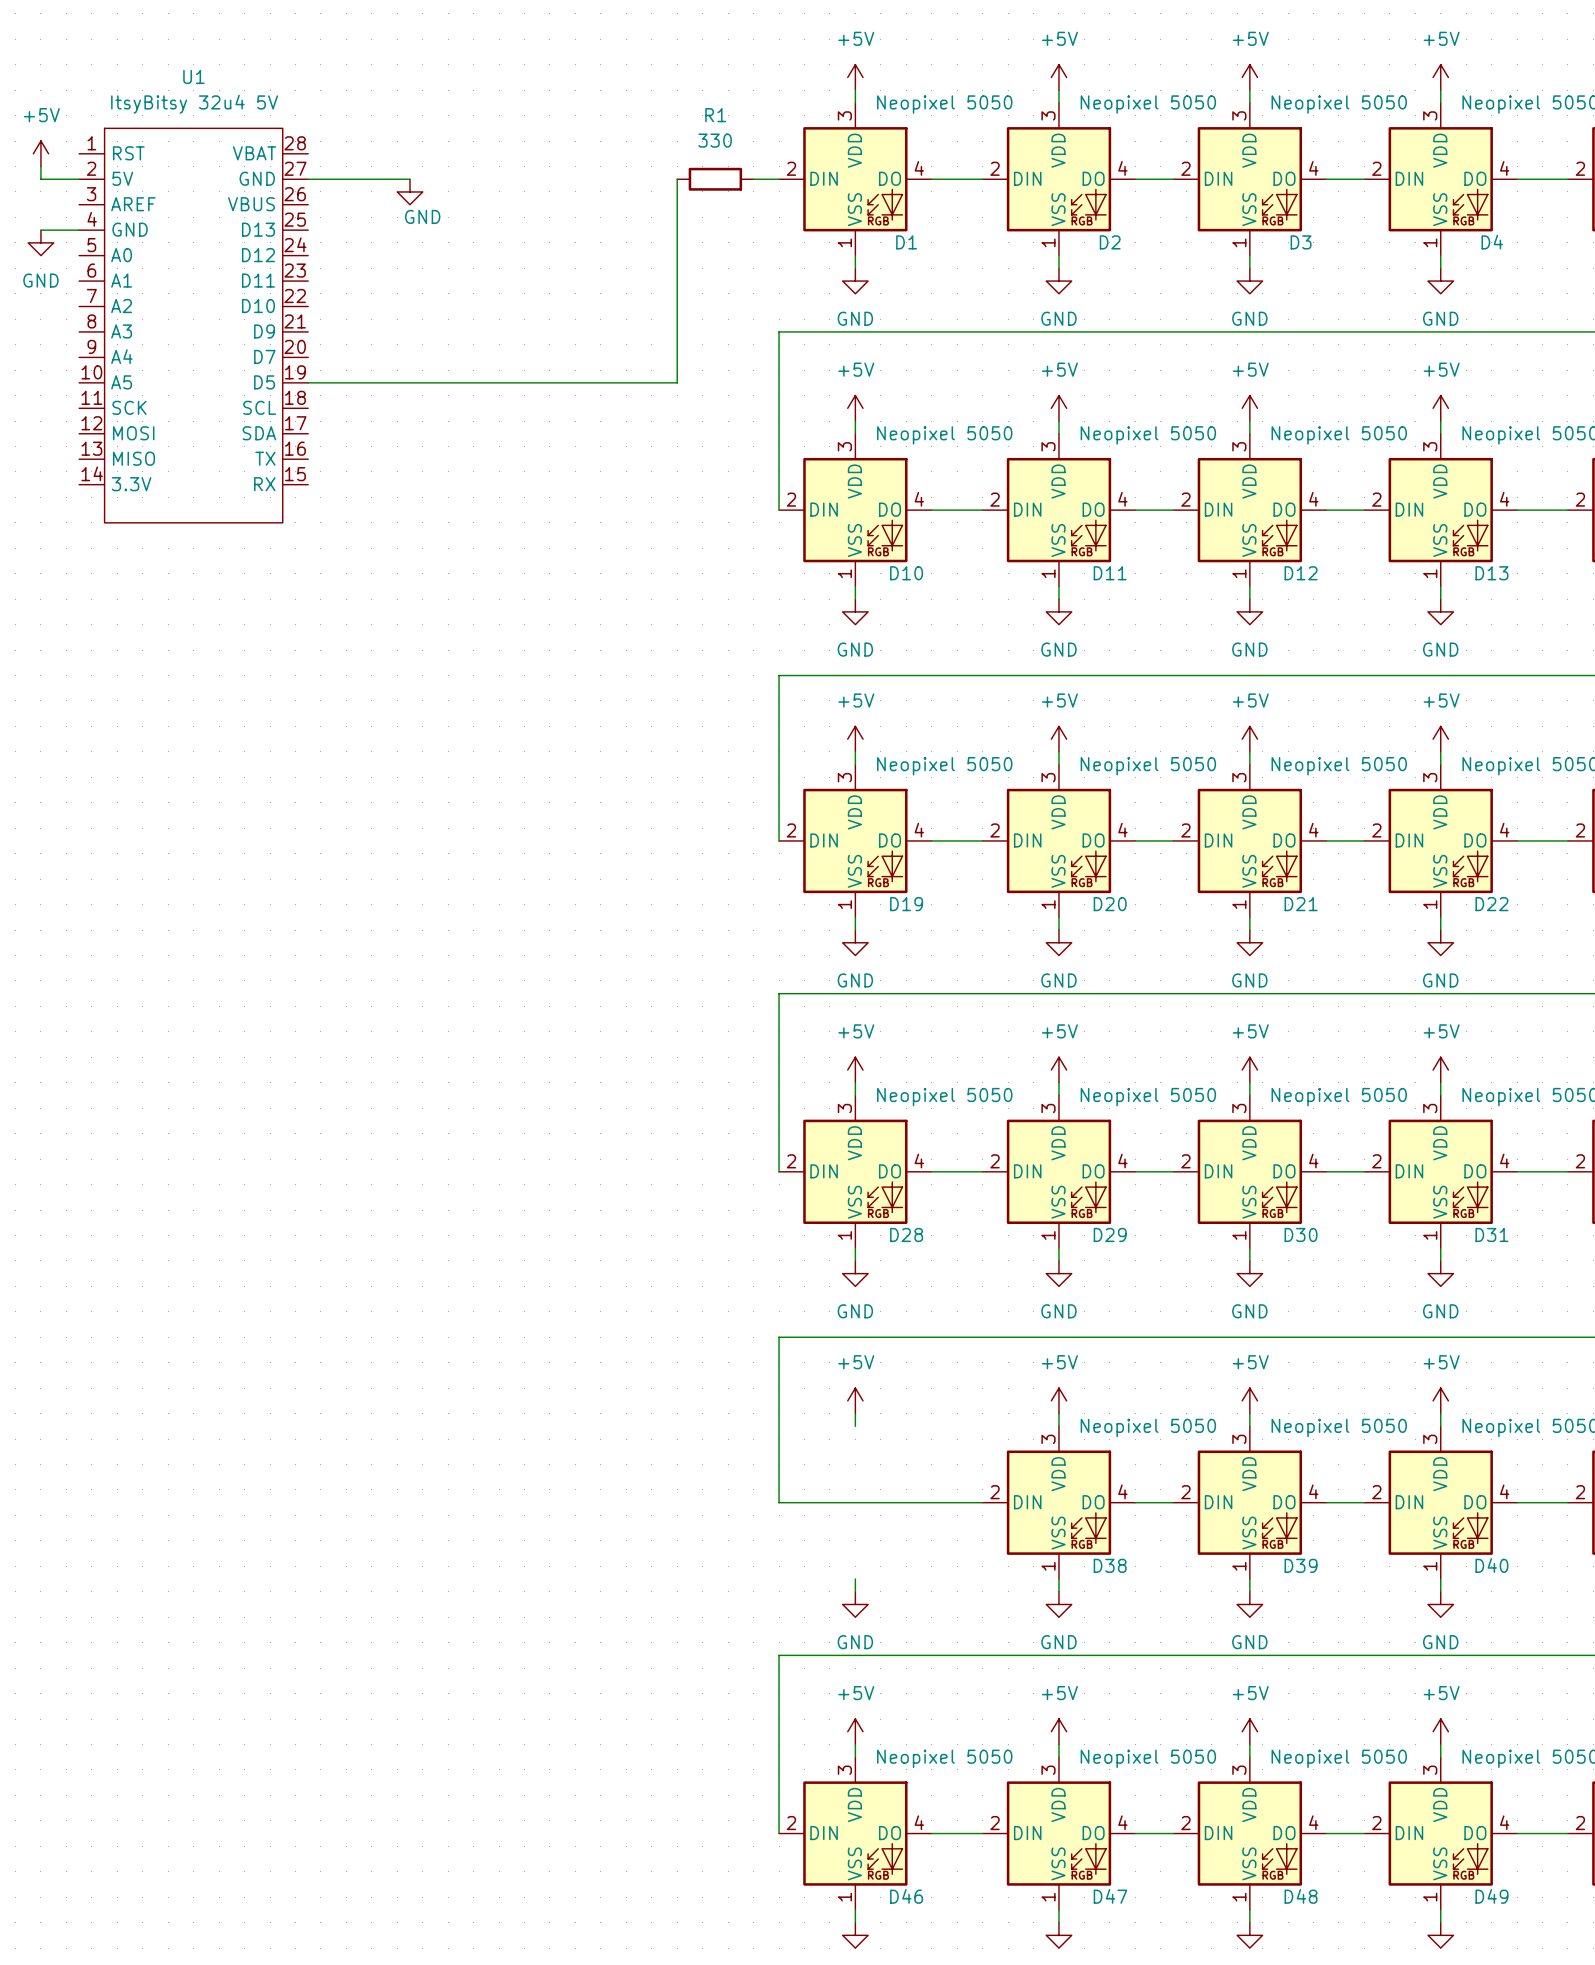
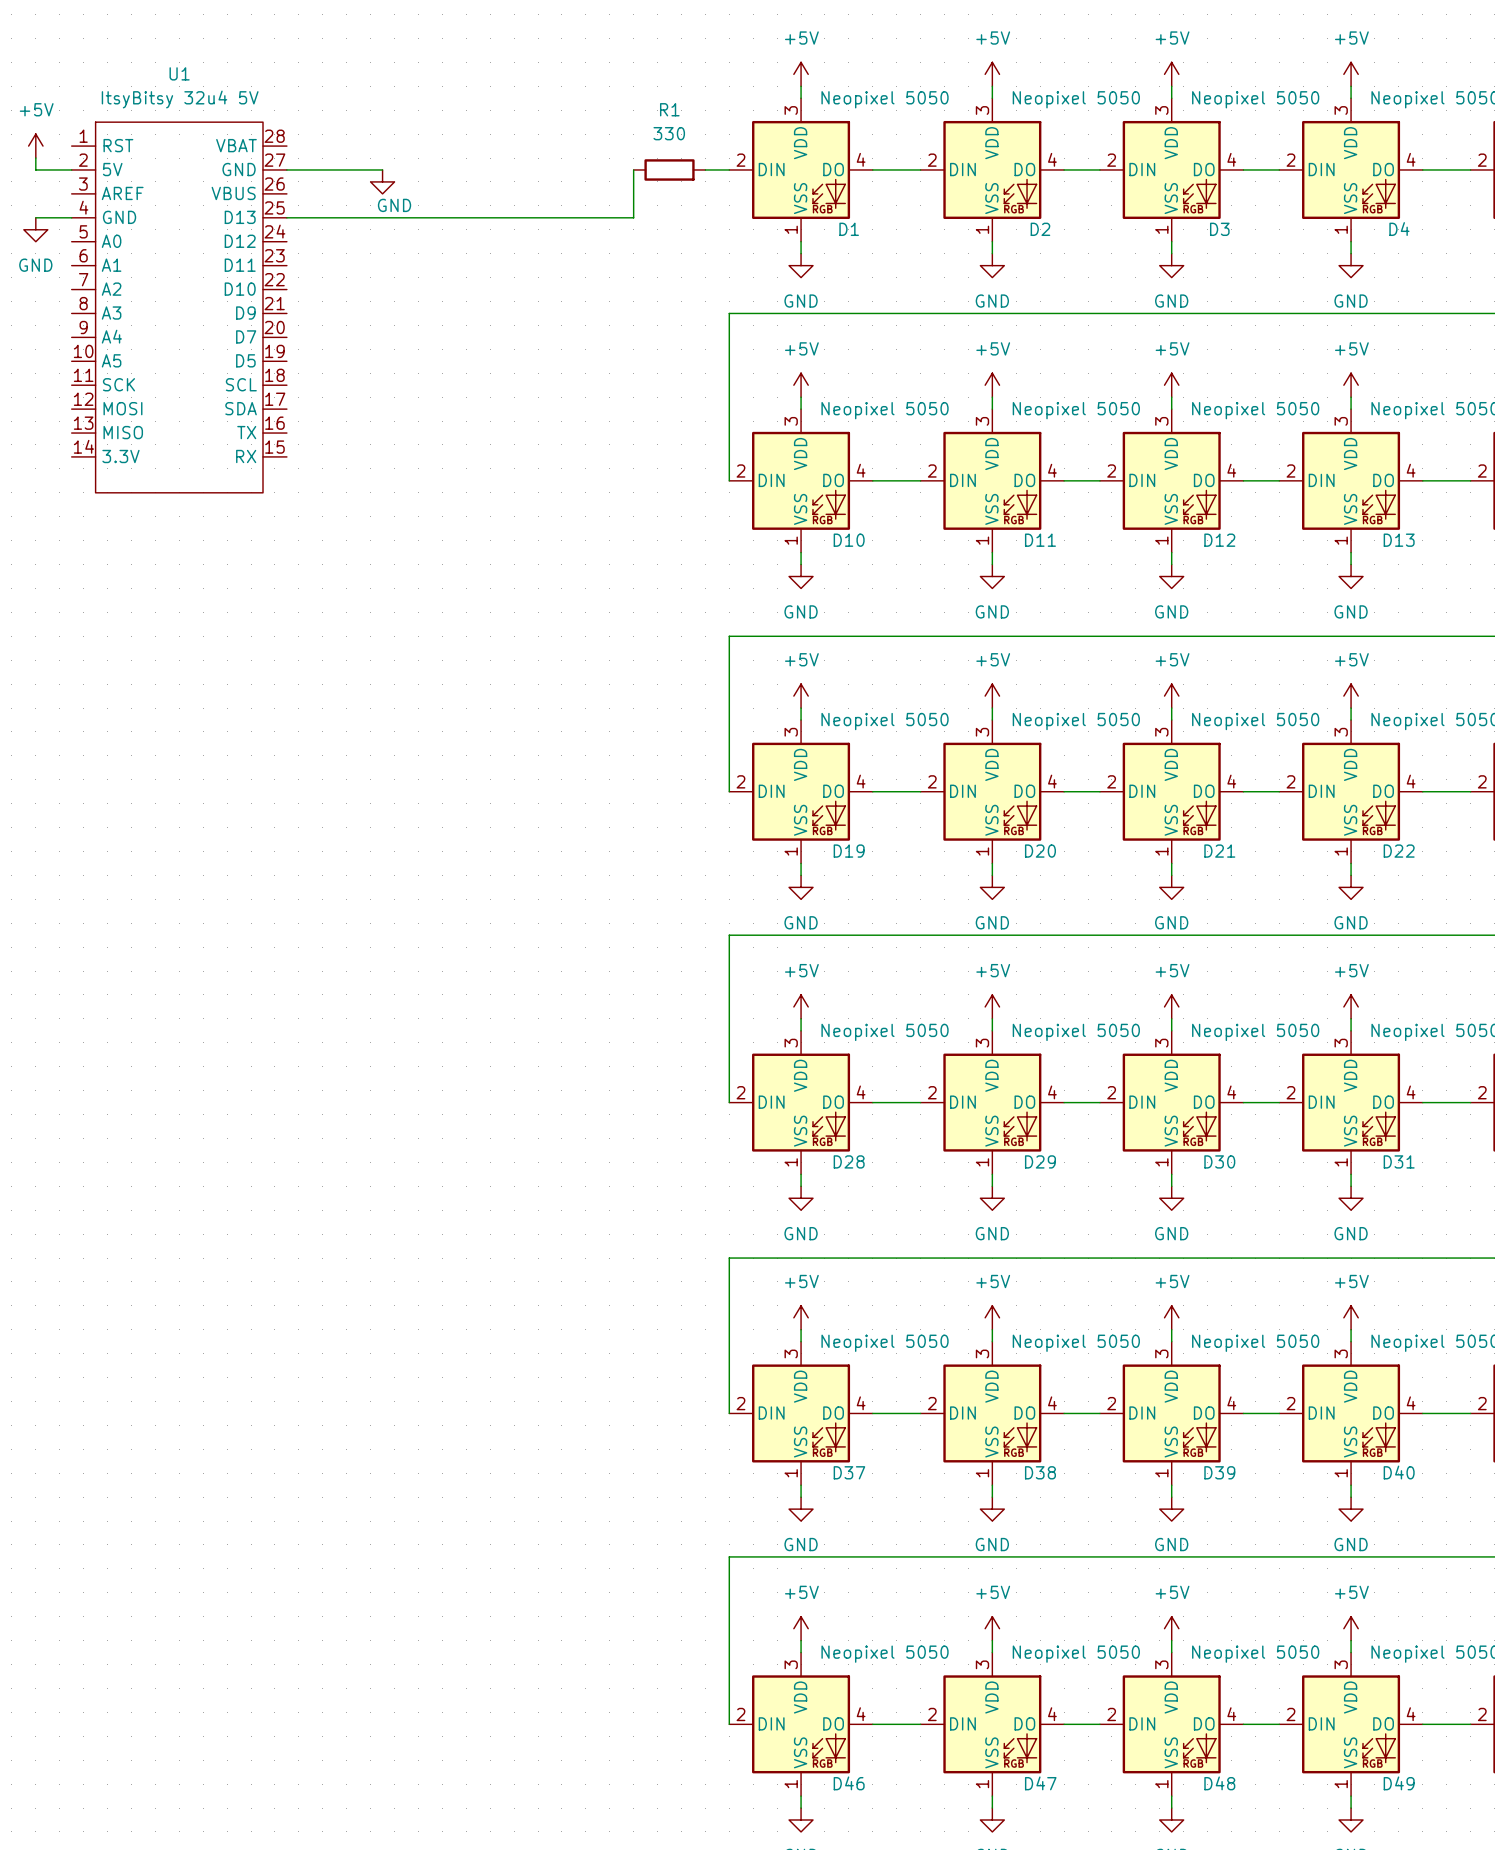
wire: (677, 230) (677, 382) (308, 382) -> (633, 217) (286, 217)
D37: none -> Neopixel 5050 (801, 1413)

